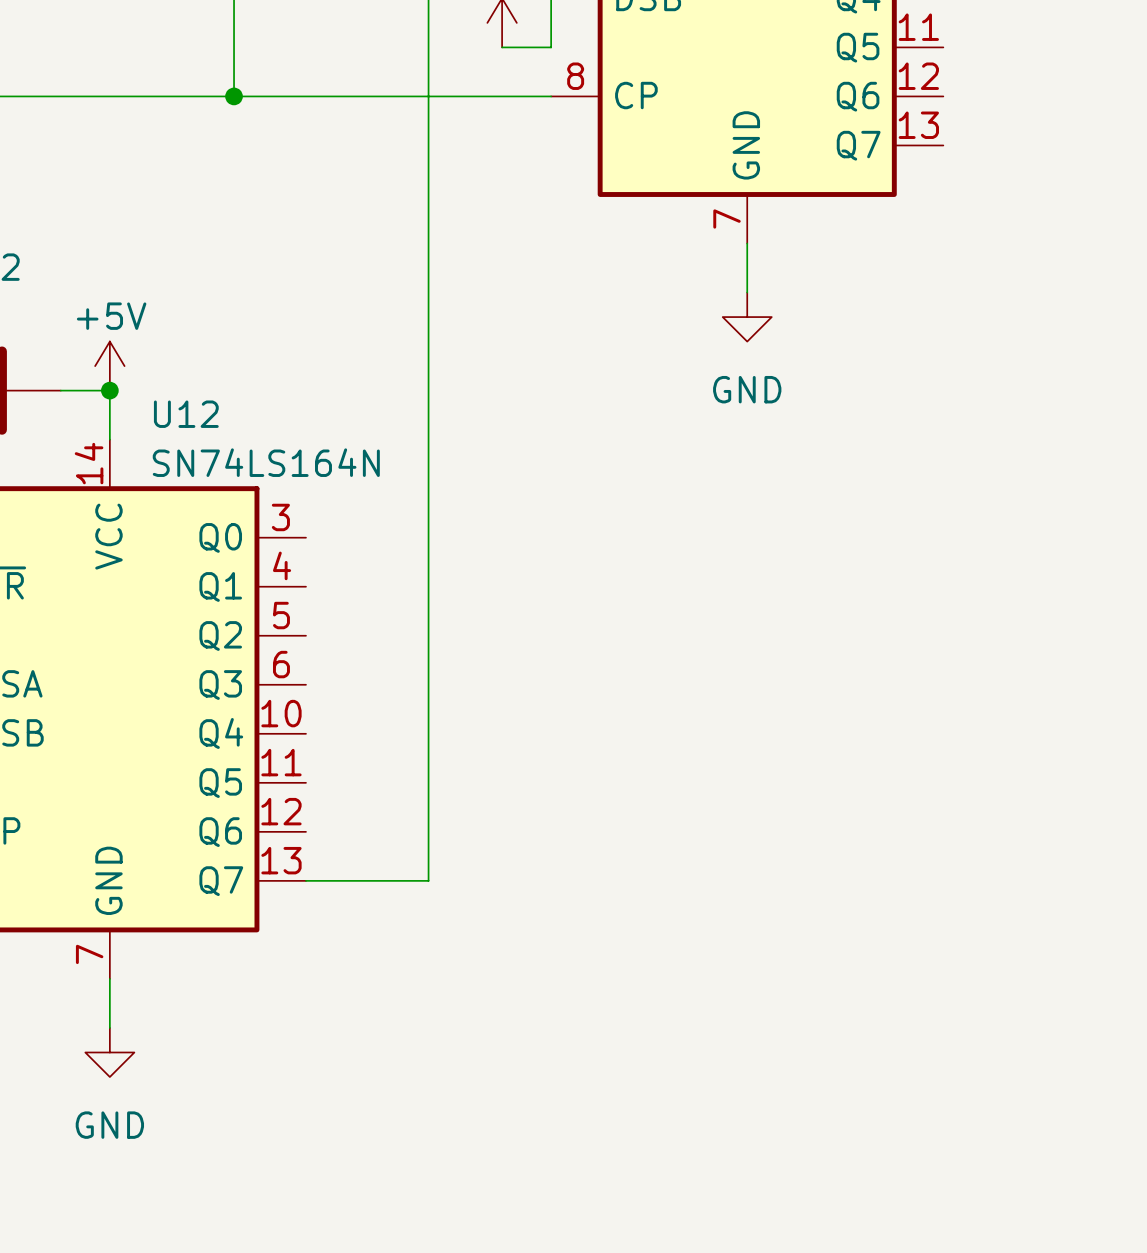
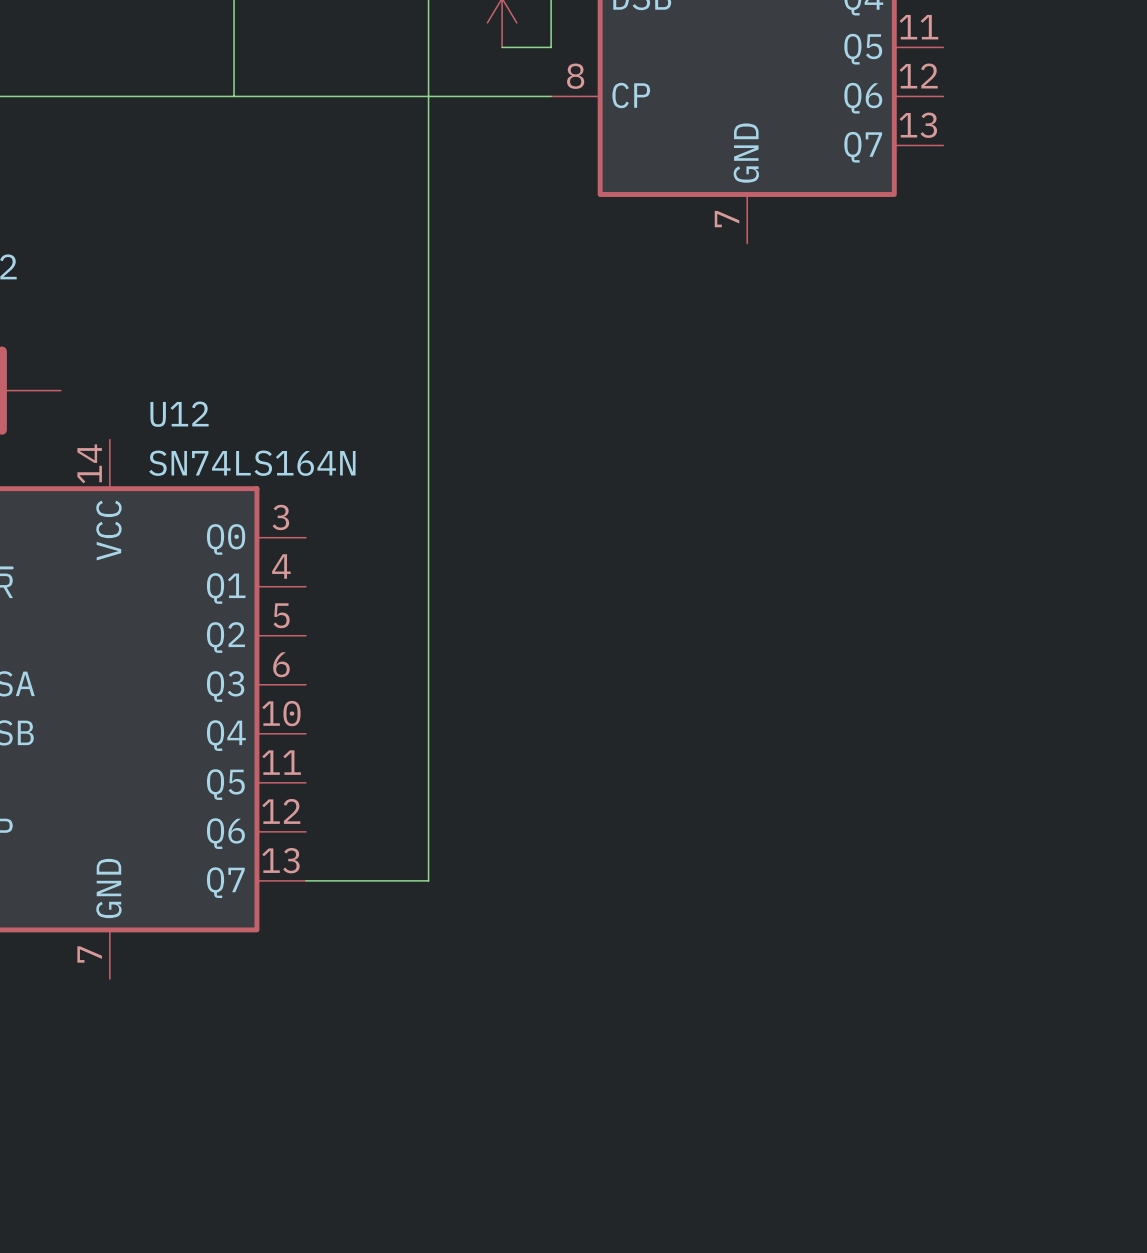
junction: (234, 96) -> none
wire: (747, 243) (747, 292) -> none
power symbol: GND (747, 317) -> none
power symbol: +5V (109, 366) -> none
wire: (60, 390) (109, 390) (109, 439) -> none
junction: (109, 390) -> none
wire: (109, 978) (109, 1027) -> none
power symbol: GND (109, 1052) -> none

